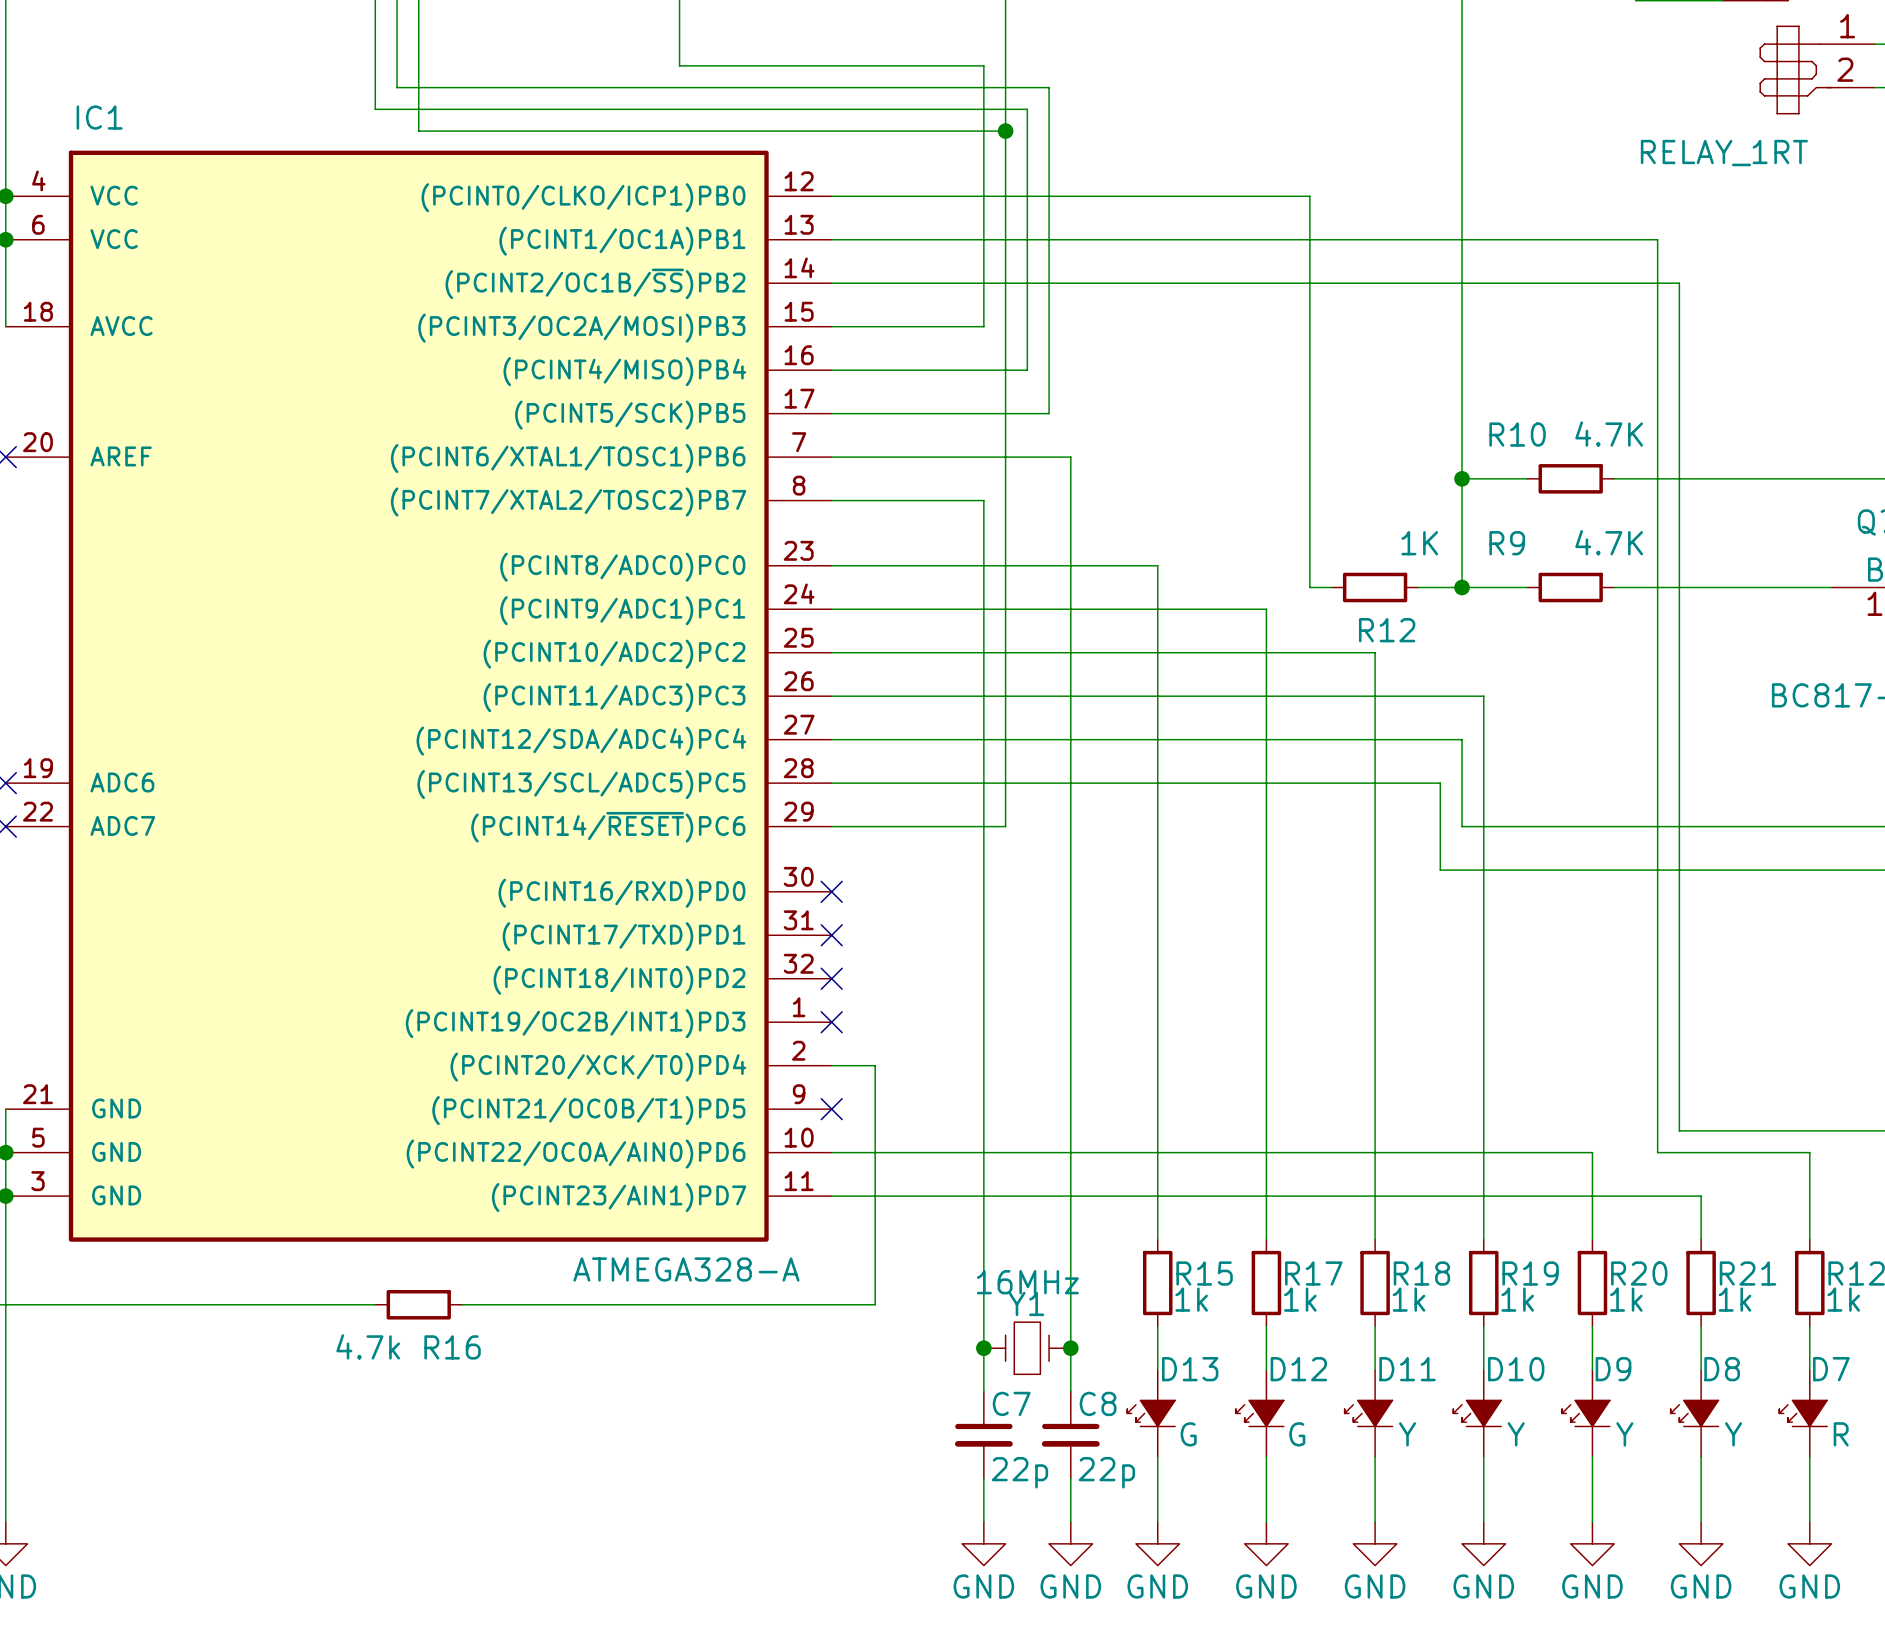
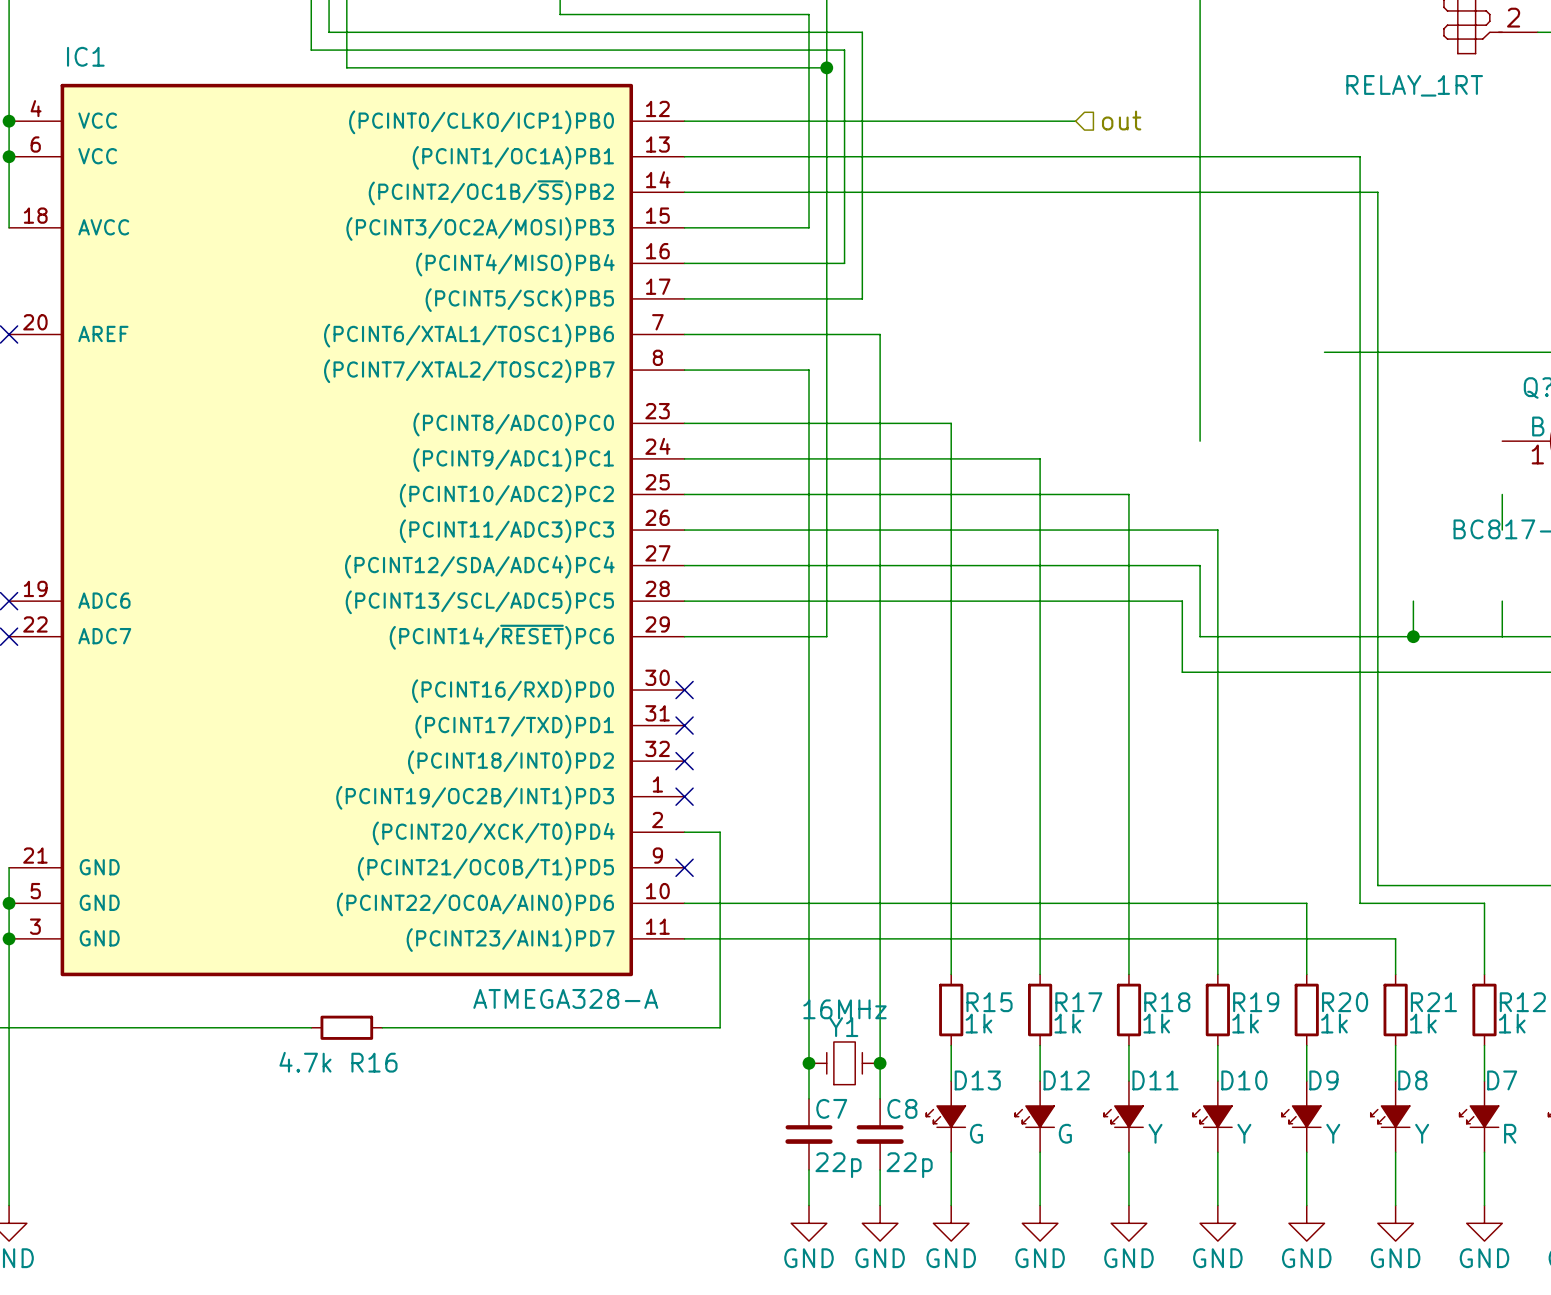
hierarchical label: none -> out (1121, 120)
wire: (1309, 196) (1309, 587) (1331, 587) -> none
wire: (1462, 478) (1527, 478) -> none
junction: (1462, 478) -> none
R10: 4.7K (1570, 478) -> none
R12: 1K (1375, 587) -> none
wire: (1418, 587) (1527, 587) -> none
junction: (1462, 587) -> none
R9: 4.7K (1570, 587) -> none
wire: (1614, 587) (1831, 587) -> none
wire: none -> (1502, 494) (1502, 530)
wire: none -> (1413, 601) (1413, 636)
wire: none -> (1502, 601) (1502, 636)
junction: none -> (1413, 636)

